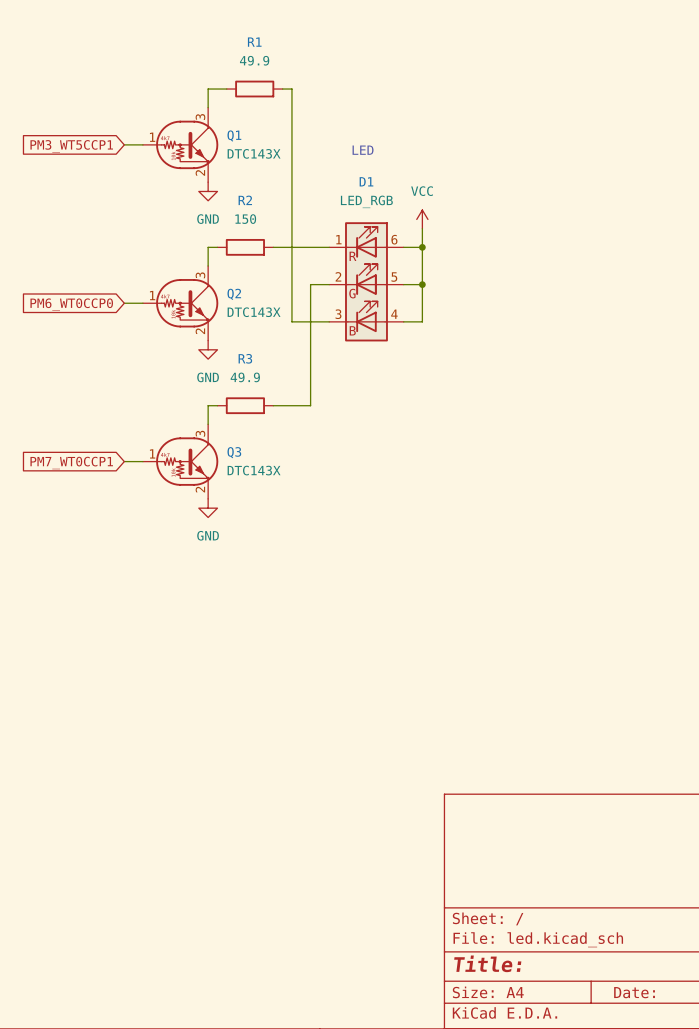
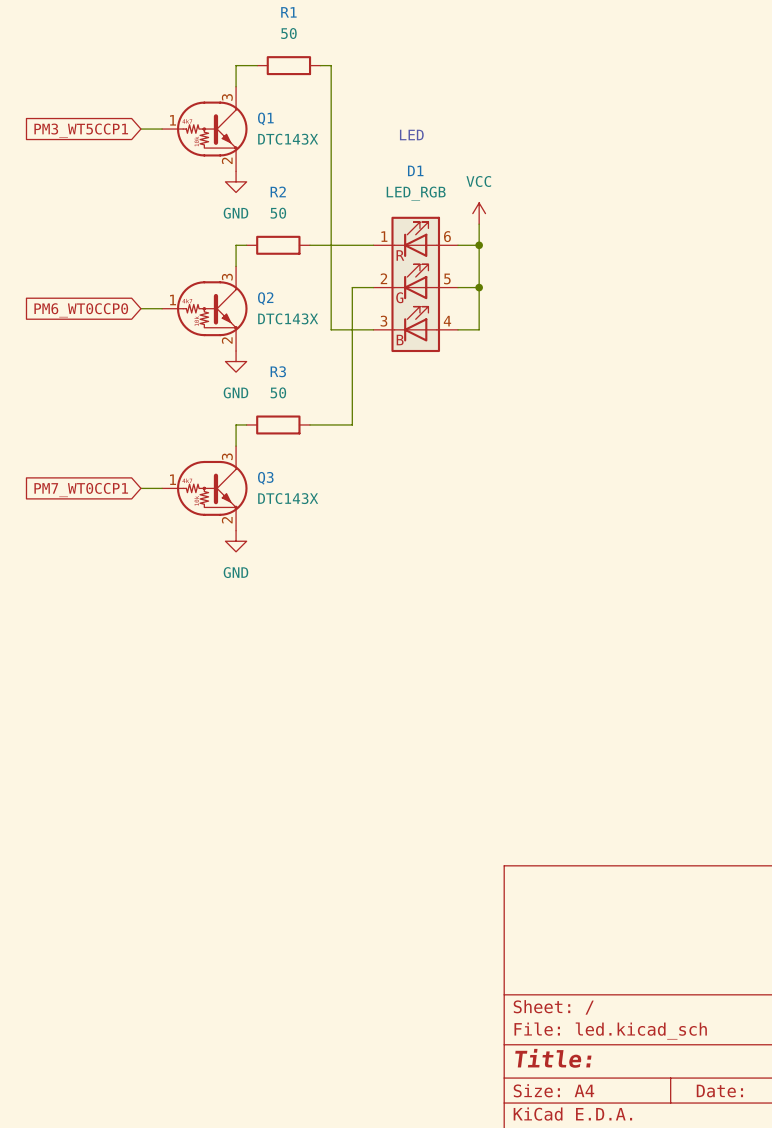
R1 value: 49.9 (254, 60) -> 50 (288, 33)
R2 value: 150 (245, 219) -> 50 (278, 213)
R3 value: 49.9 (245, 377) -> 50 (278, 392)

